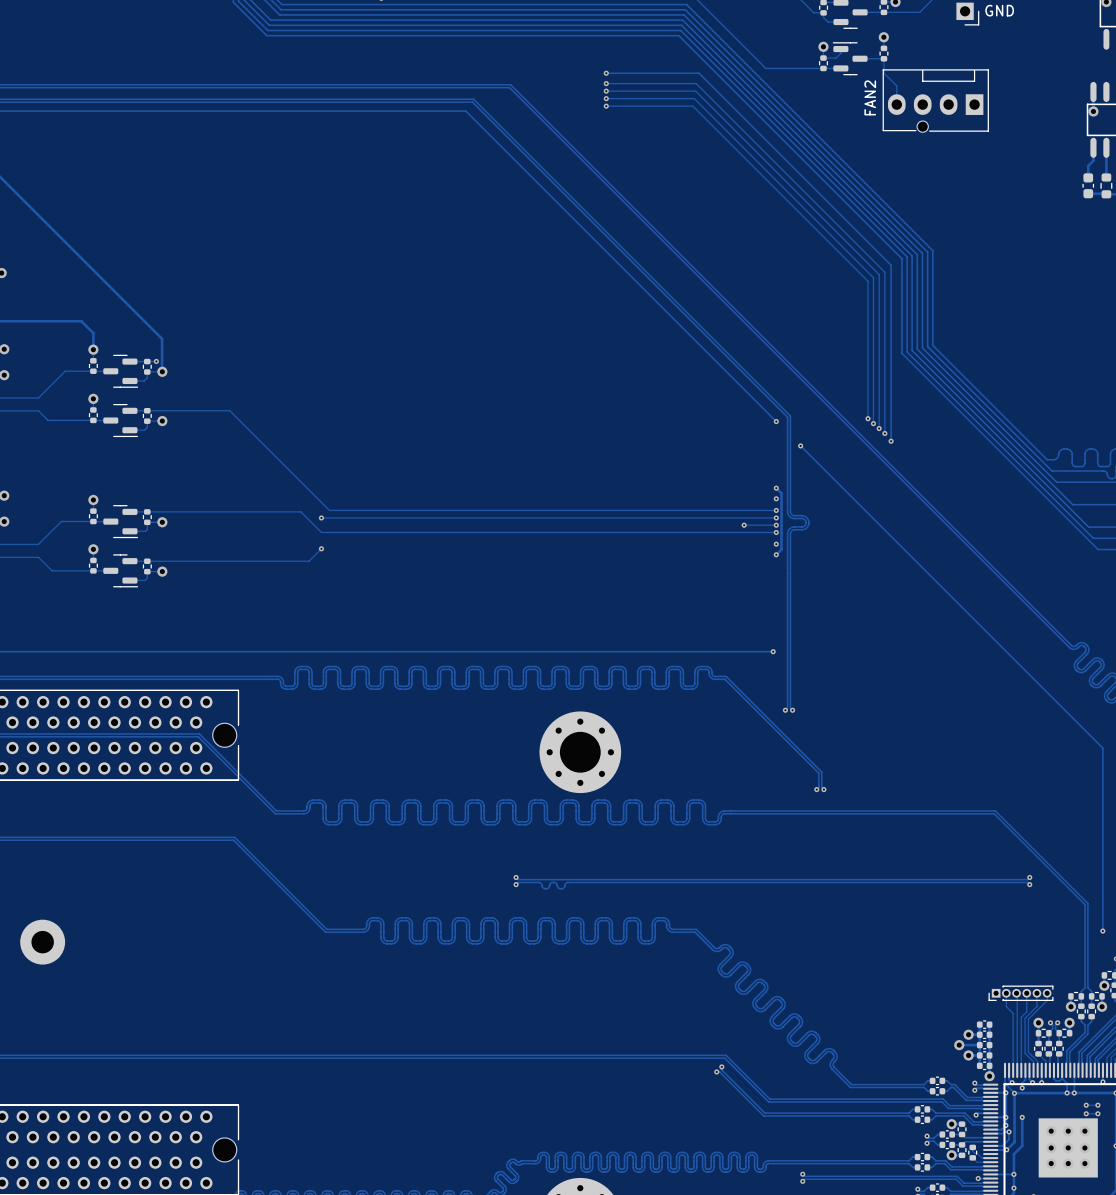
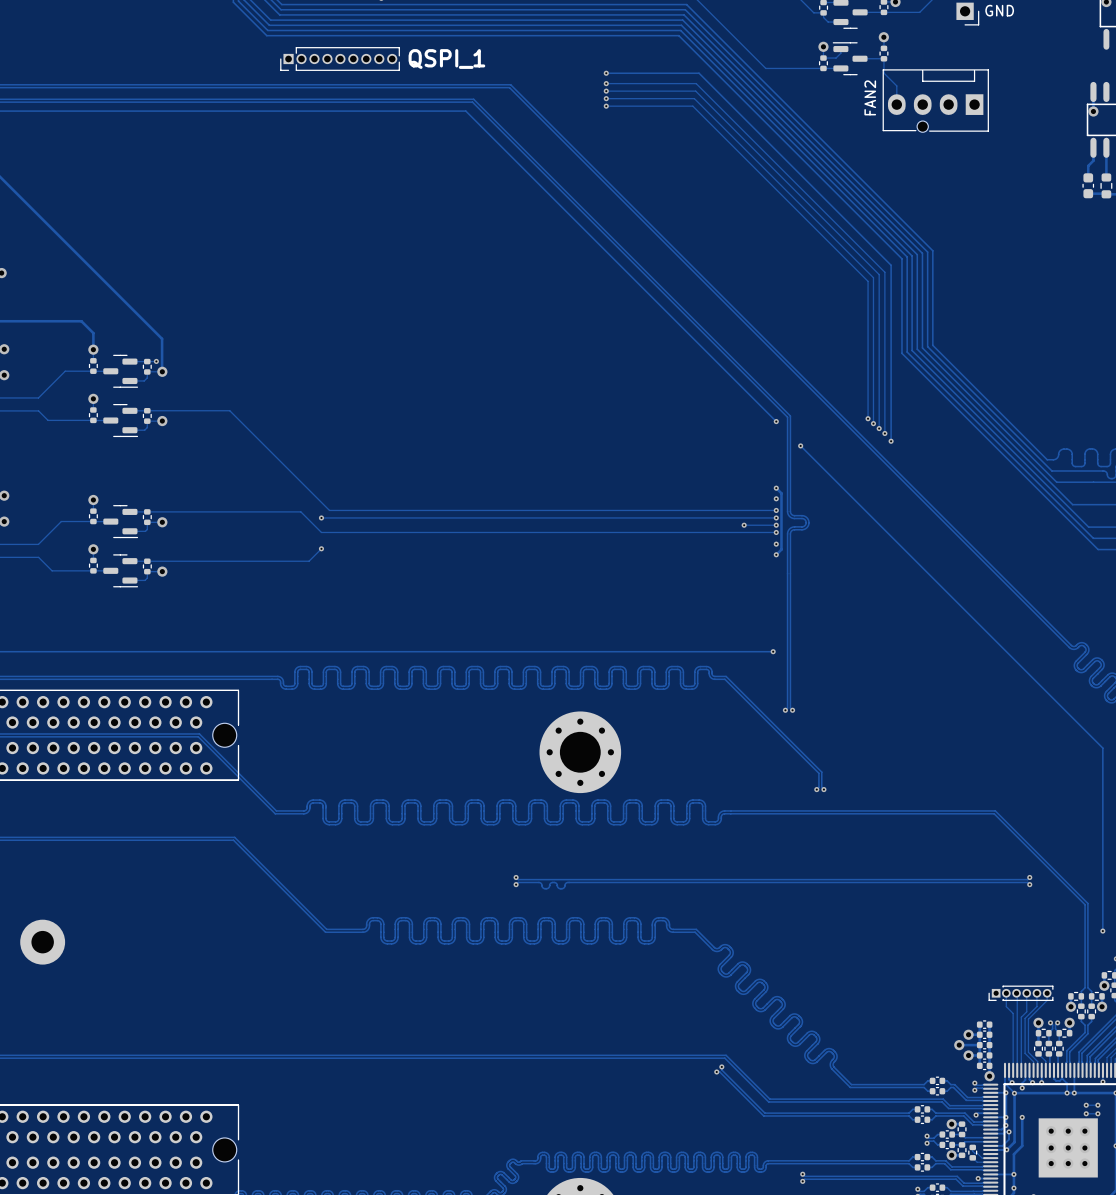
part: none -> (340, 58)
text: none -> QSPI_1 (446, 59)

